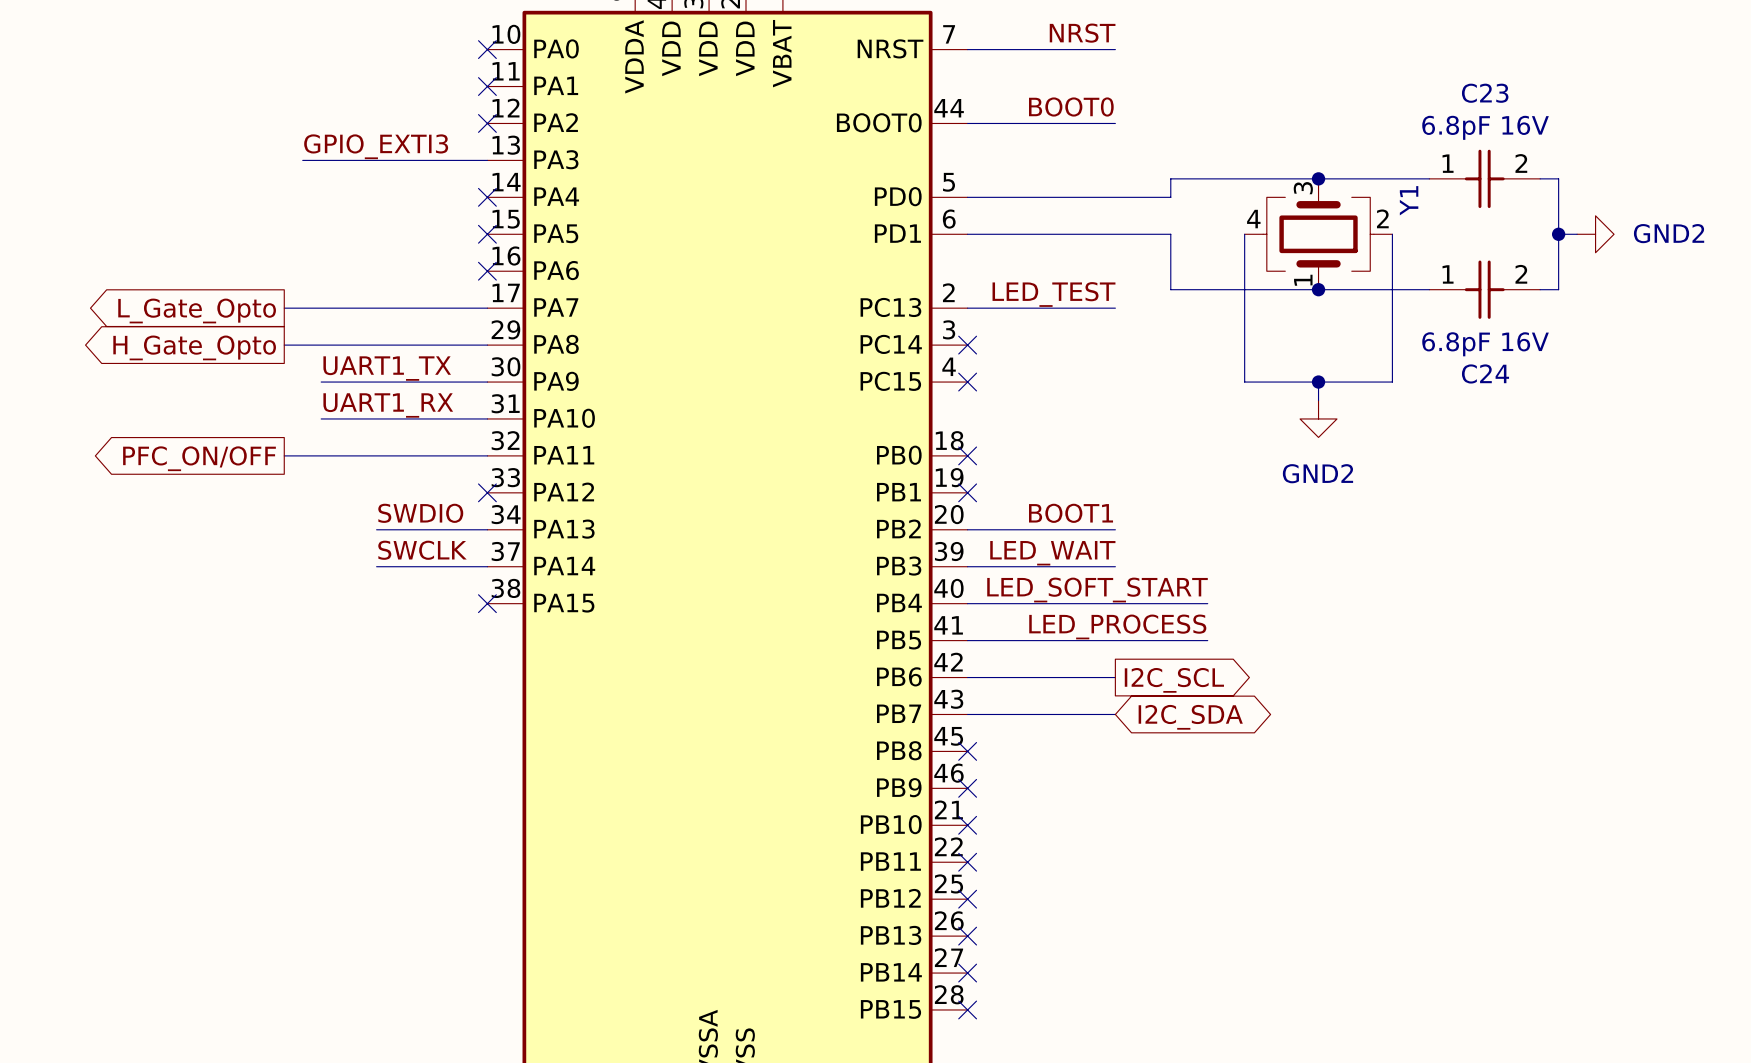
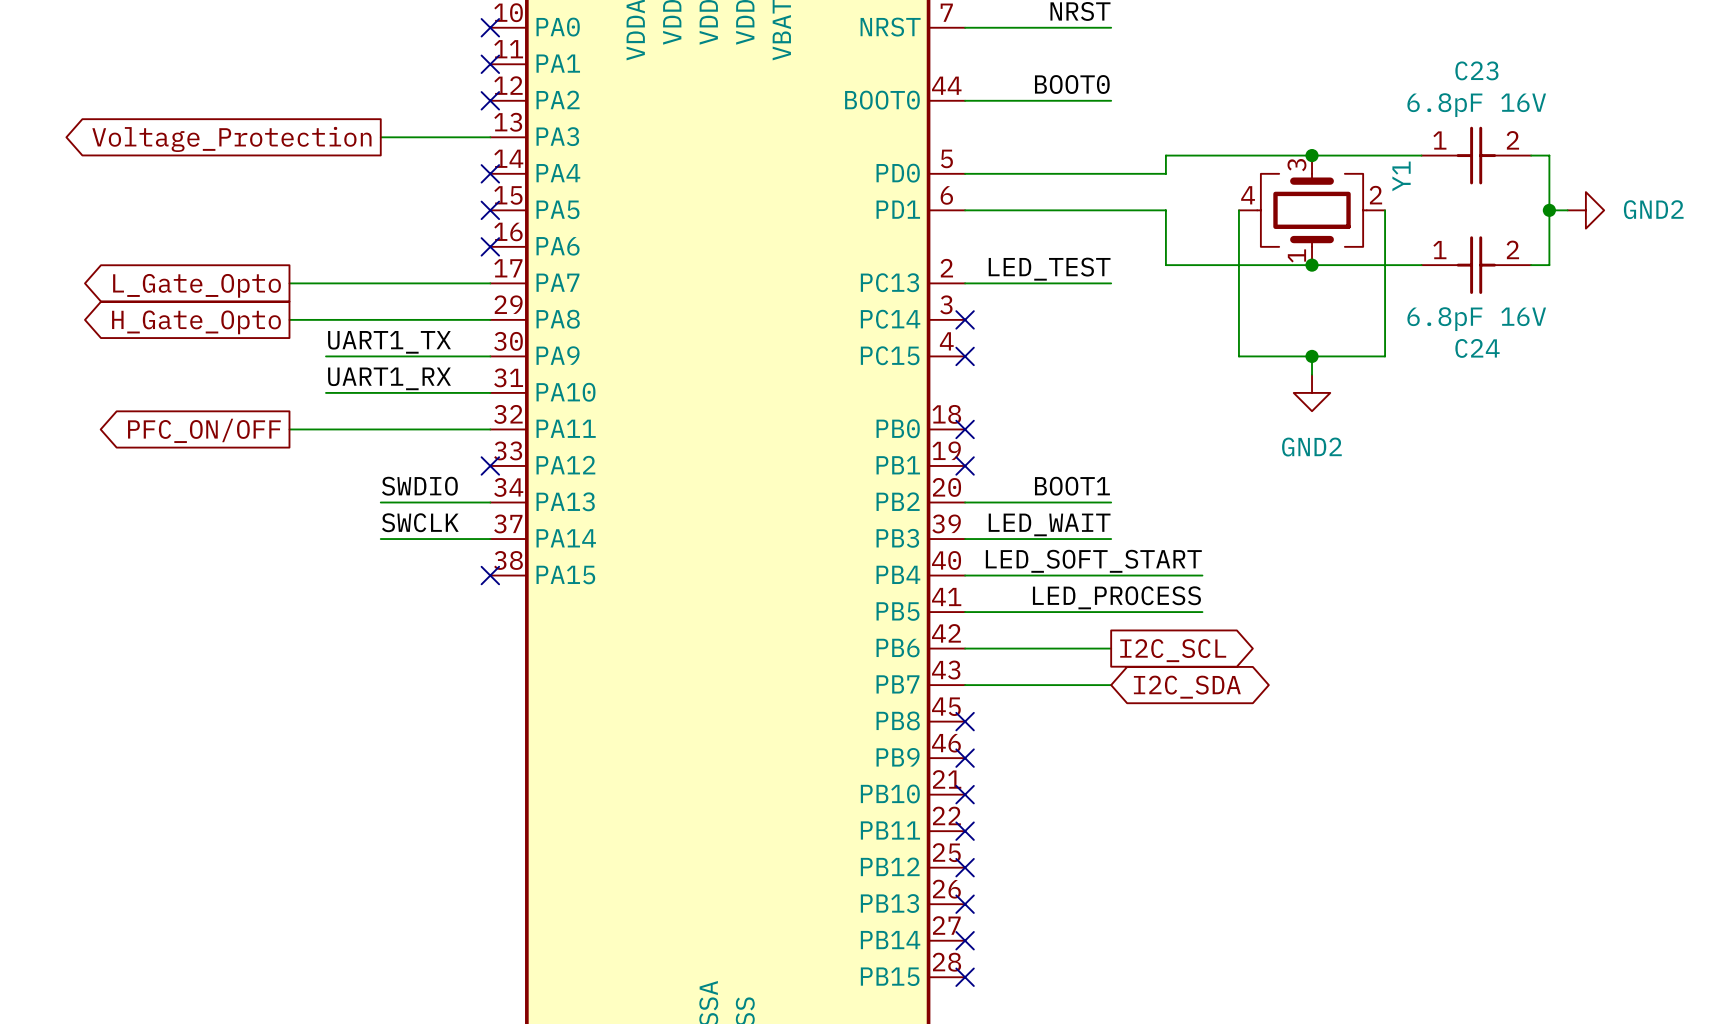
label: GPIO_EXTI3 (376, 146) -> none
wire: (302, 160) (376, 160) -> none
global label: none -> Voltage_Protection (231, 139)

